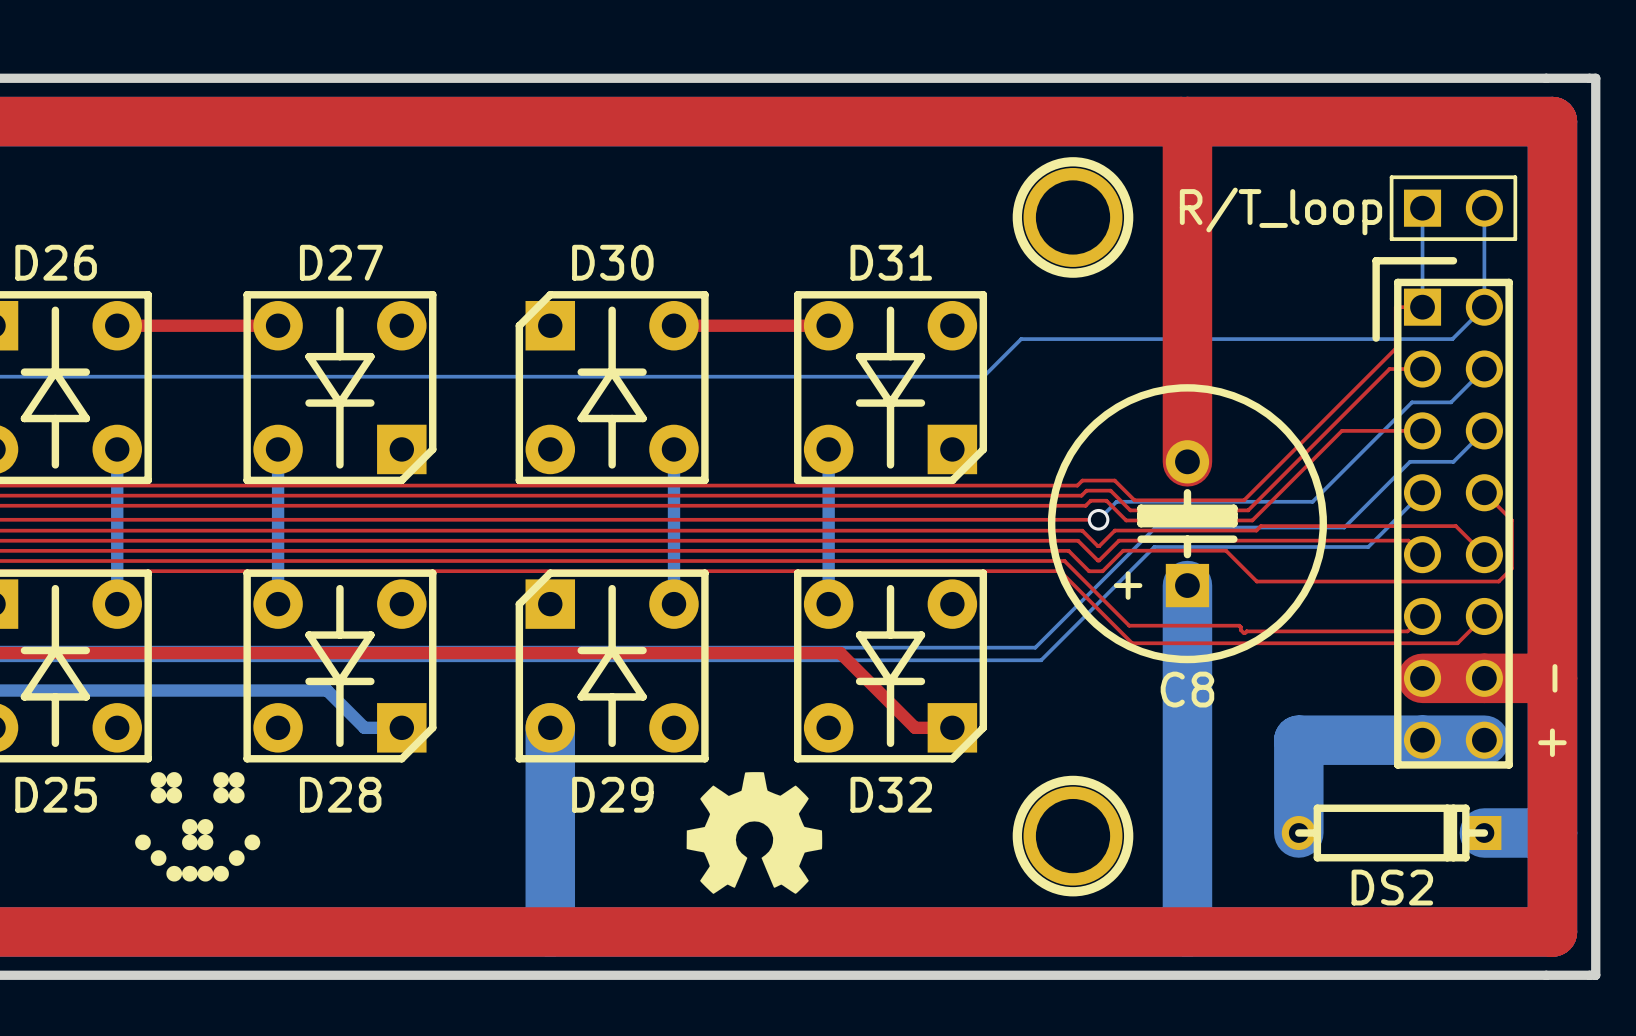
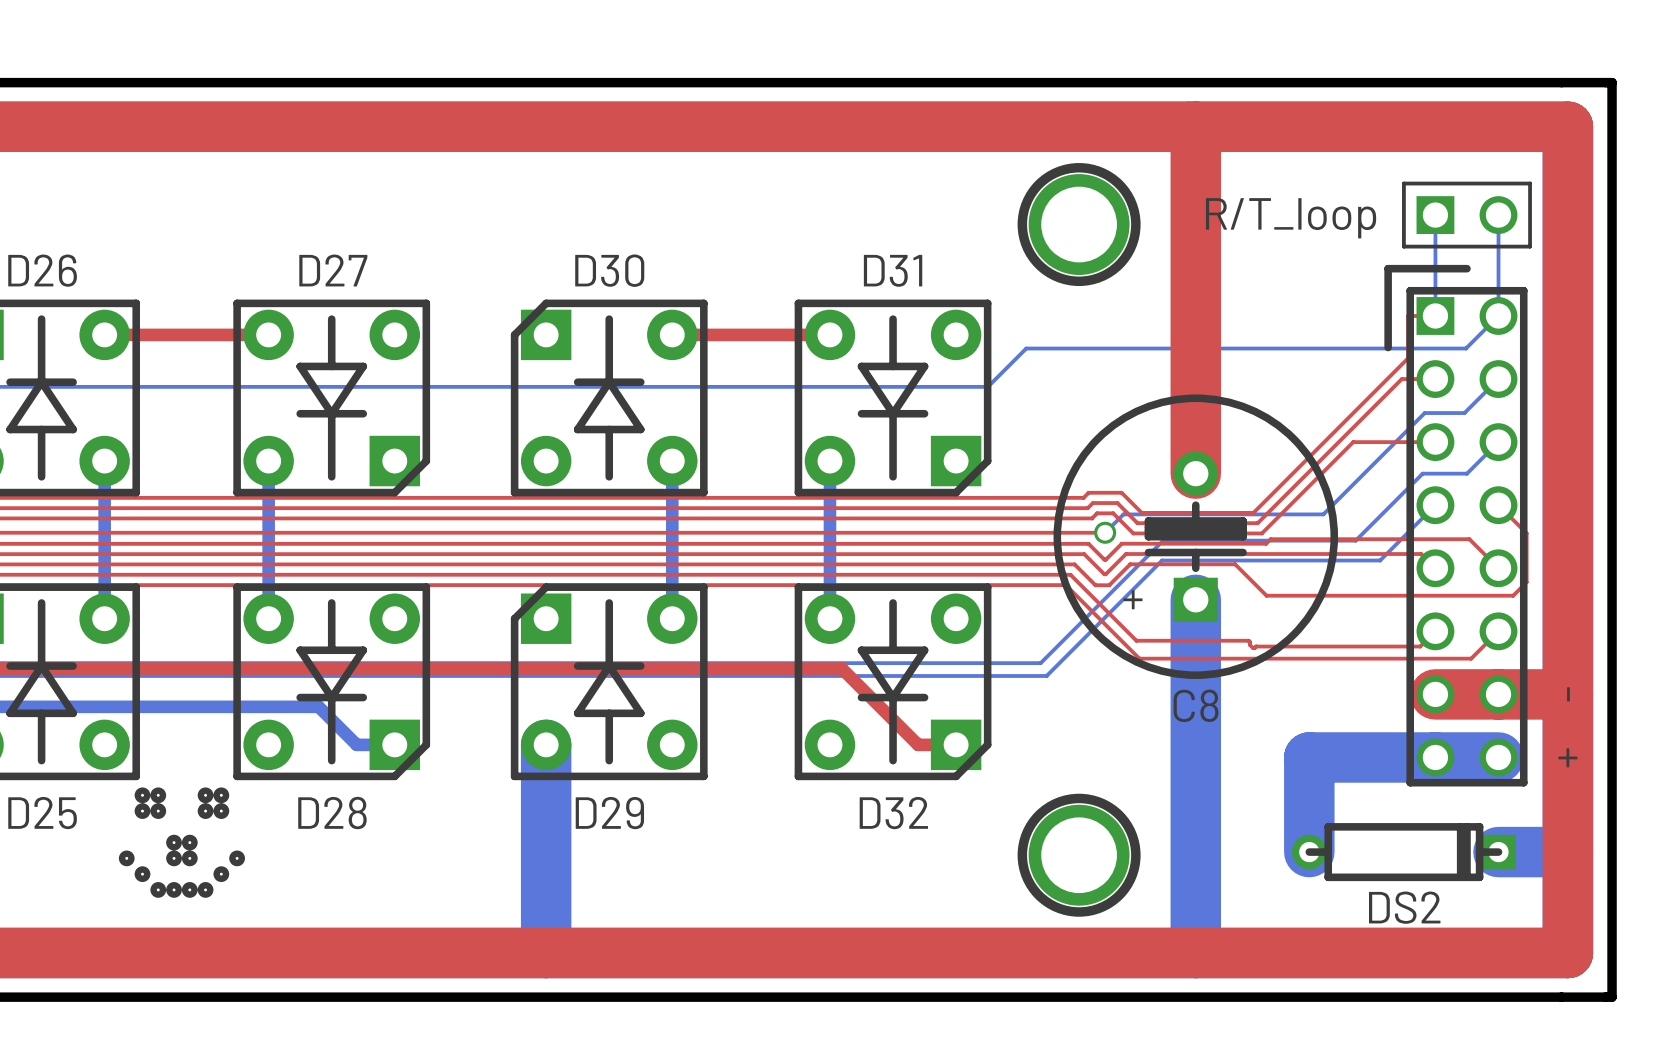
drawing: none -> [118, 787, 245, 898]
drawing shape: [135, 772, 261, 882] -> [181, 834, 198, 851]
drawing: [686, 772, 823, 894] -> none

